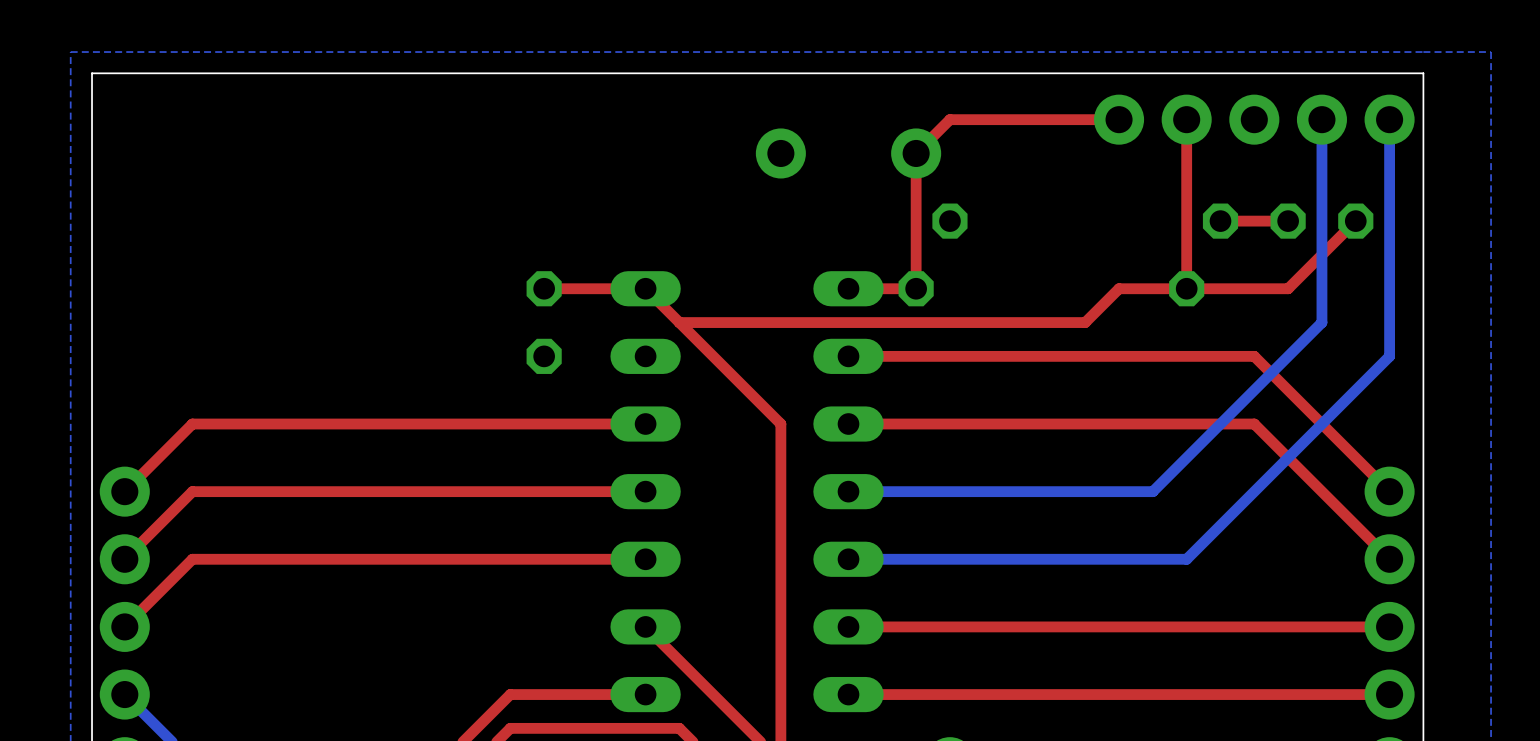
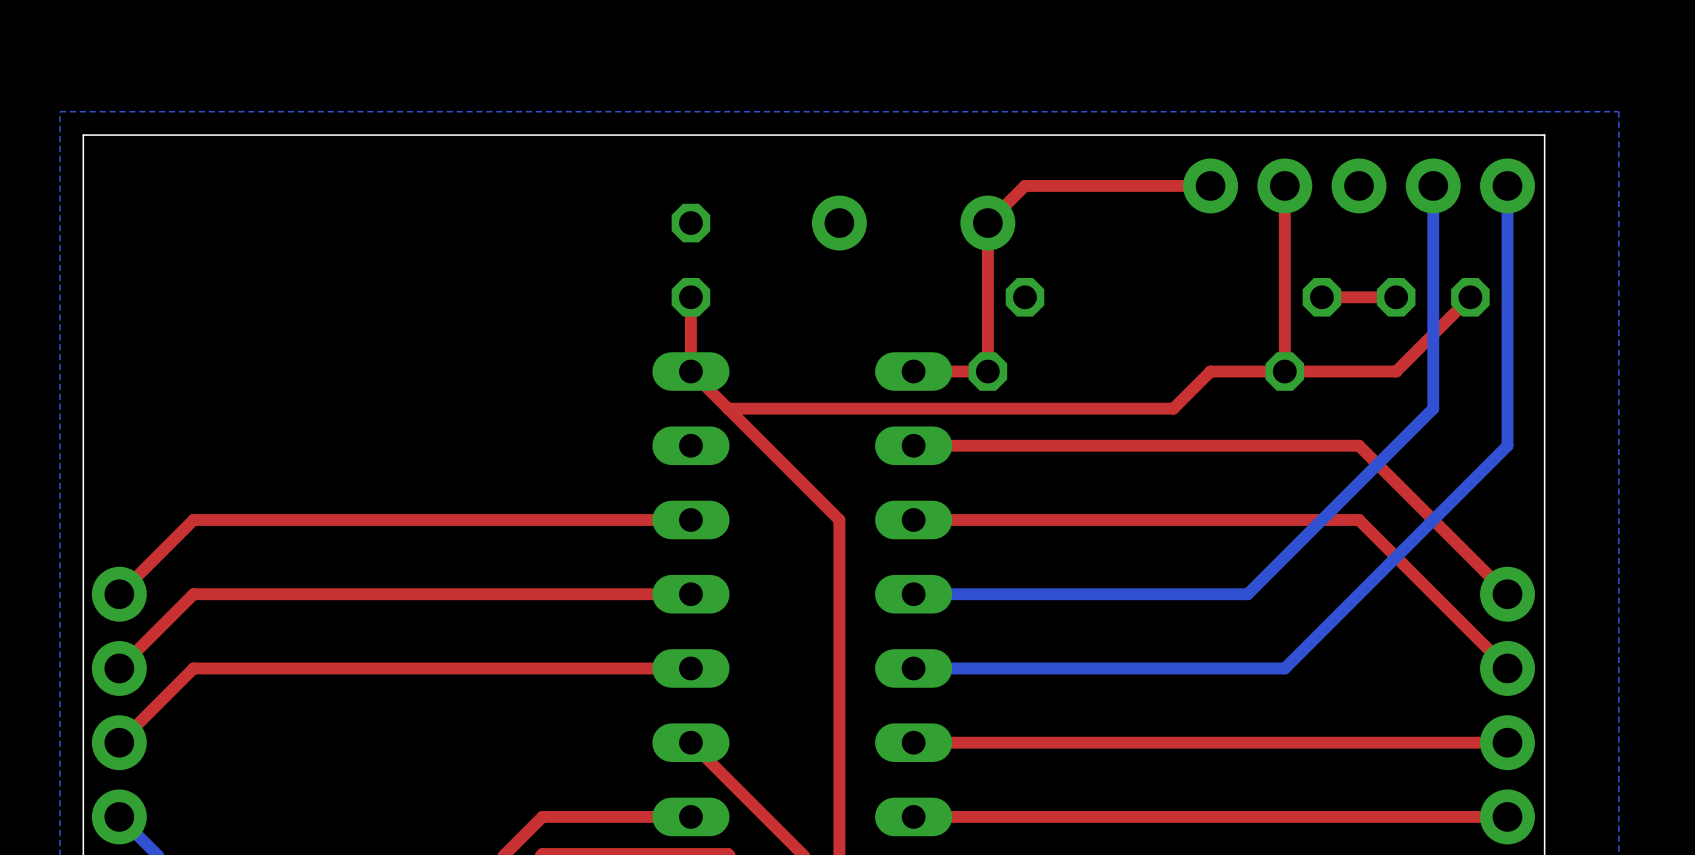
top track: (645, 288) (544, 288) -> (690, 371) (690, 297)
part position: (544, 322) -> (690, 260)

